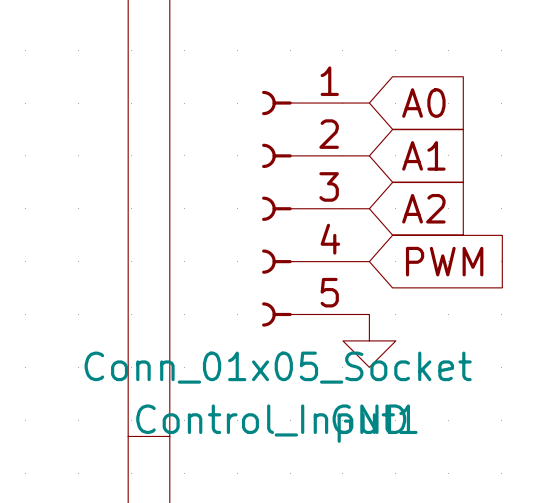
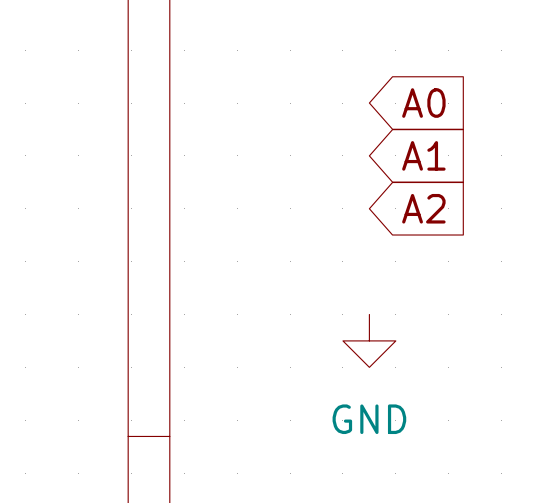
Control_Input1: Conn_01x05_Socket (315, 208) -> none
global label: PWM (444, 261) -> none

